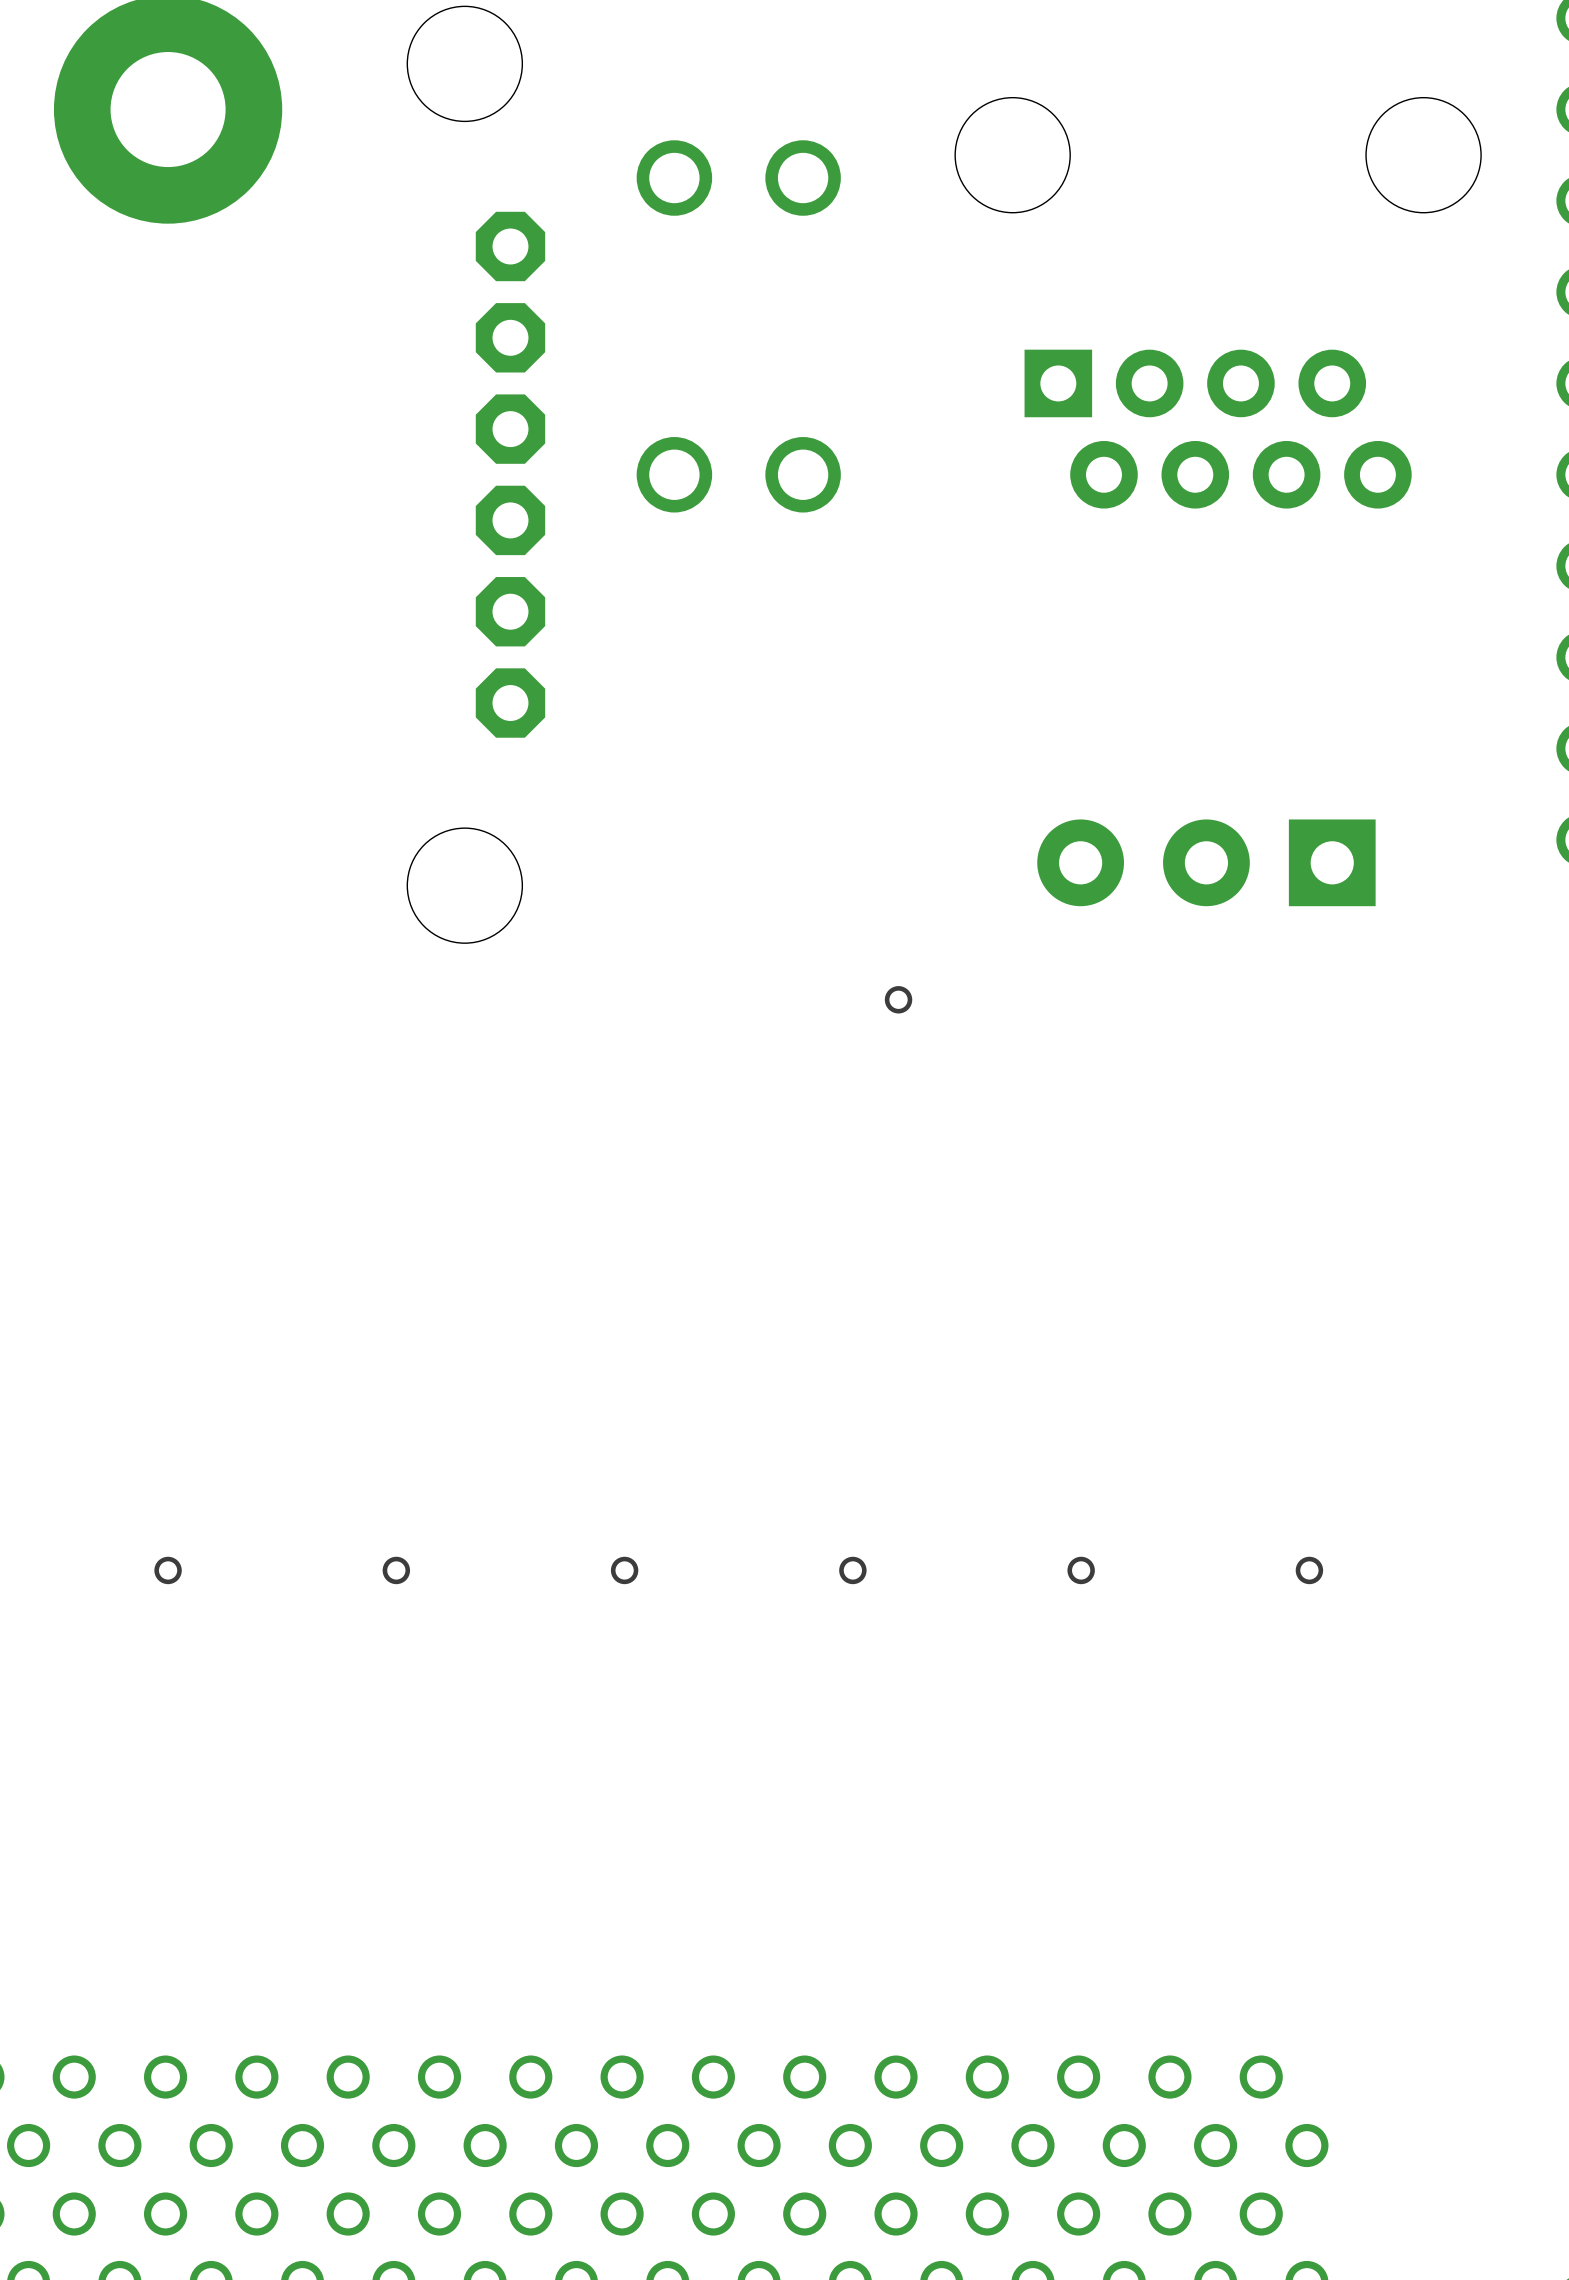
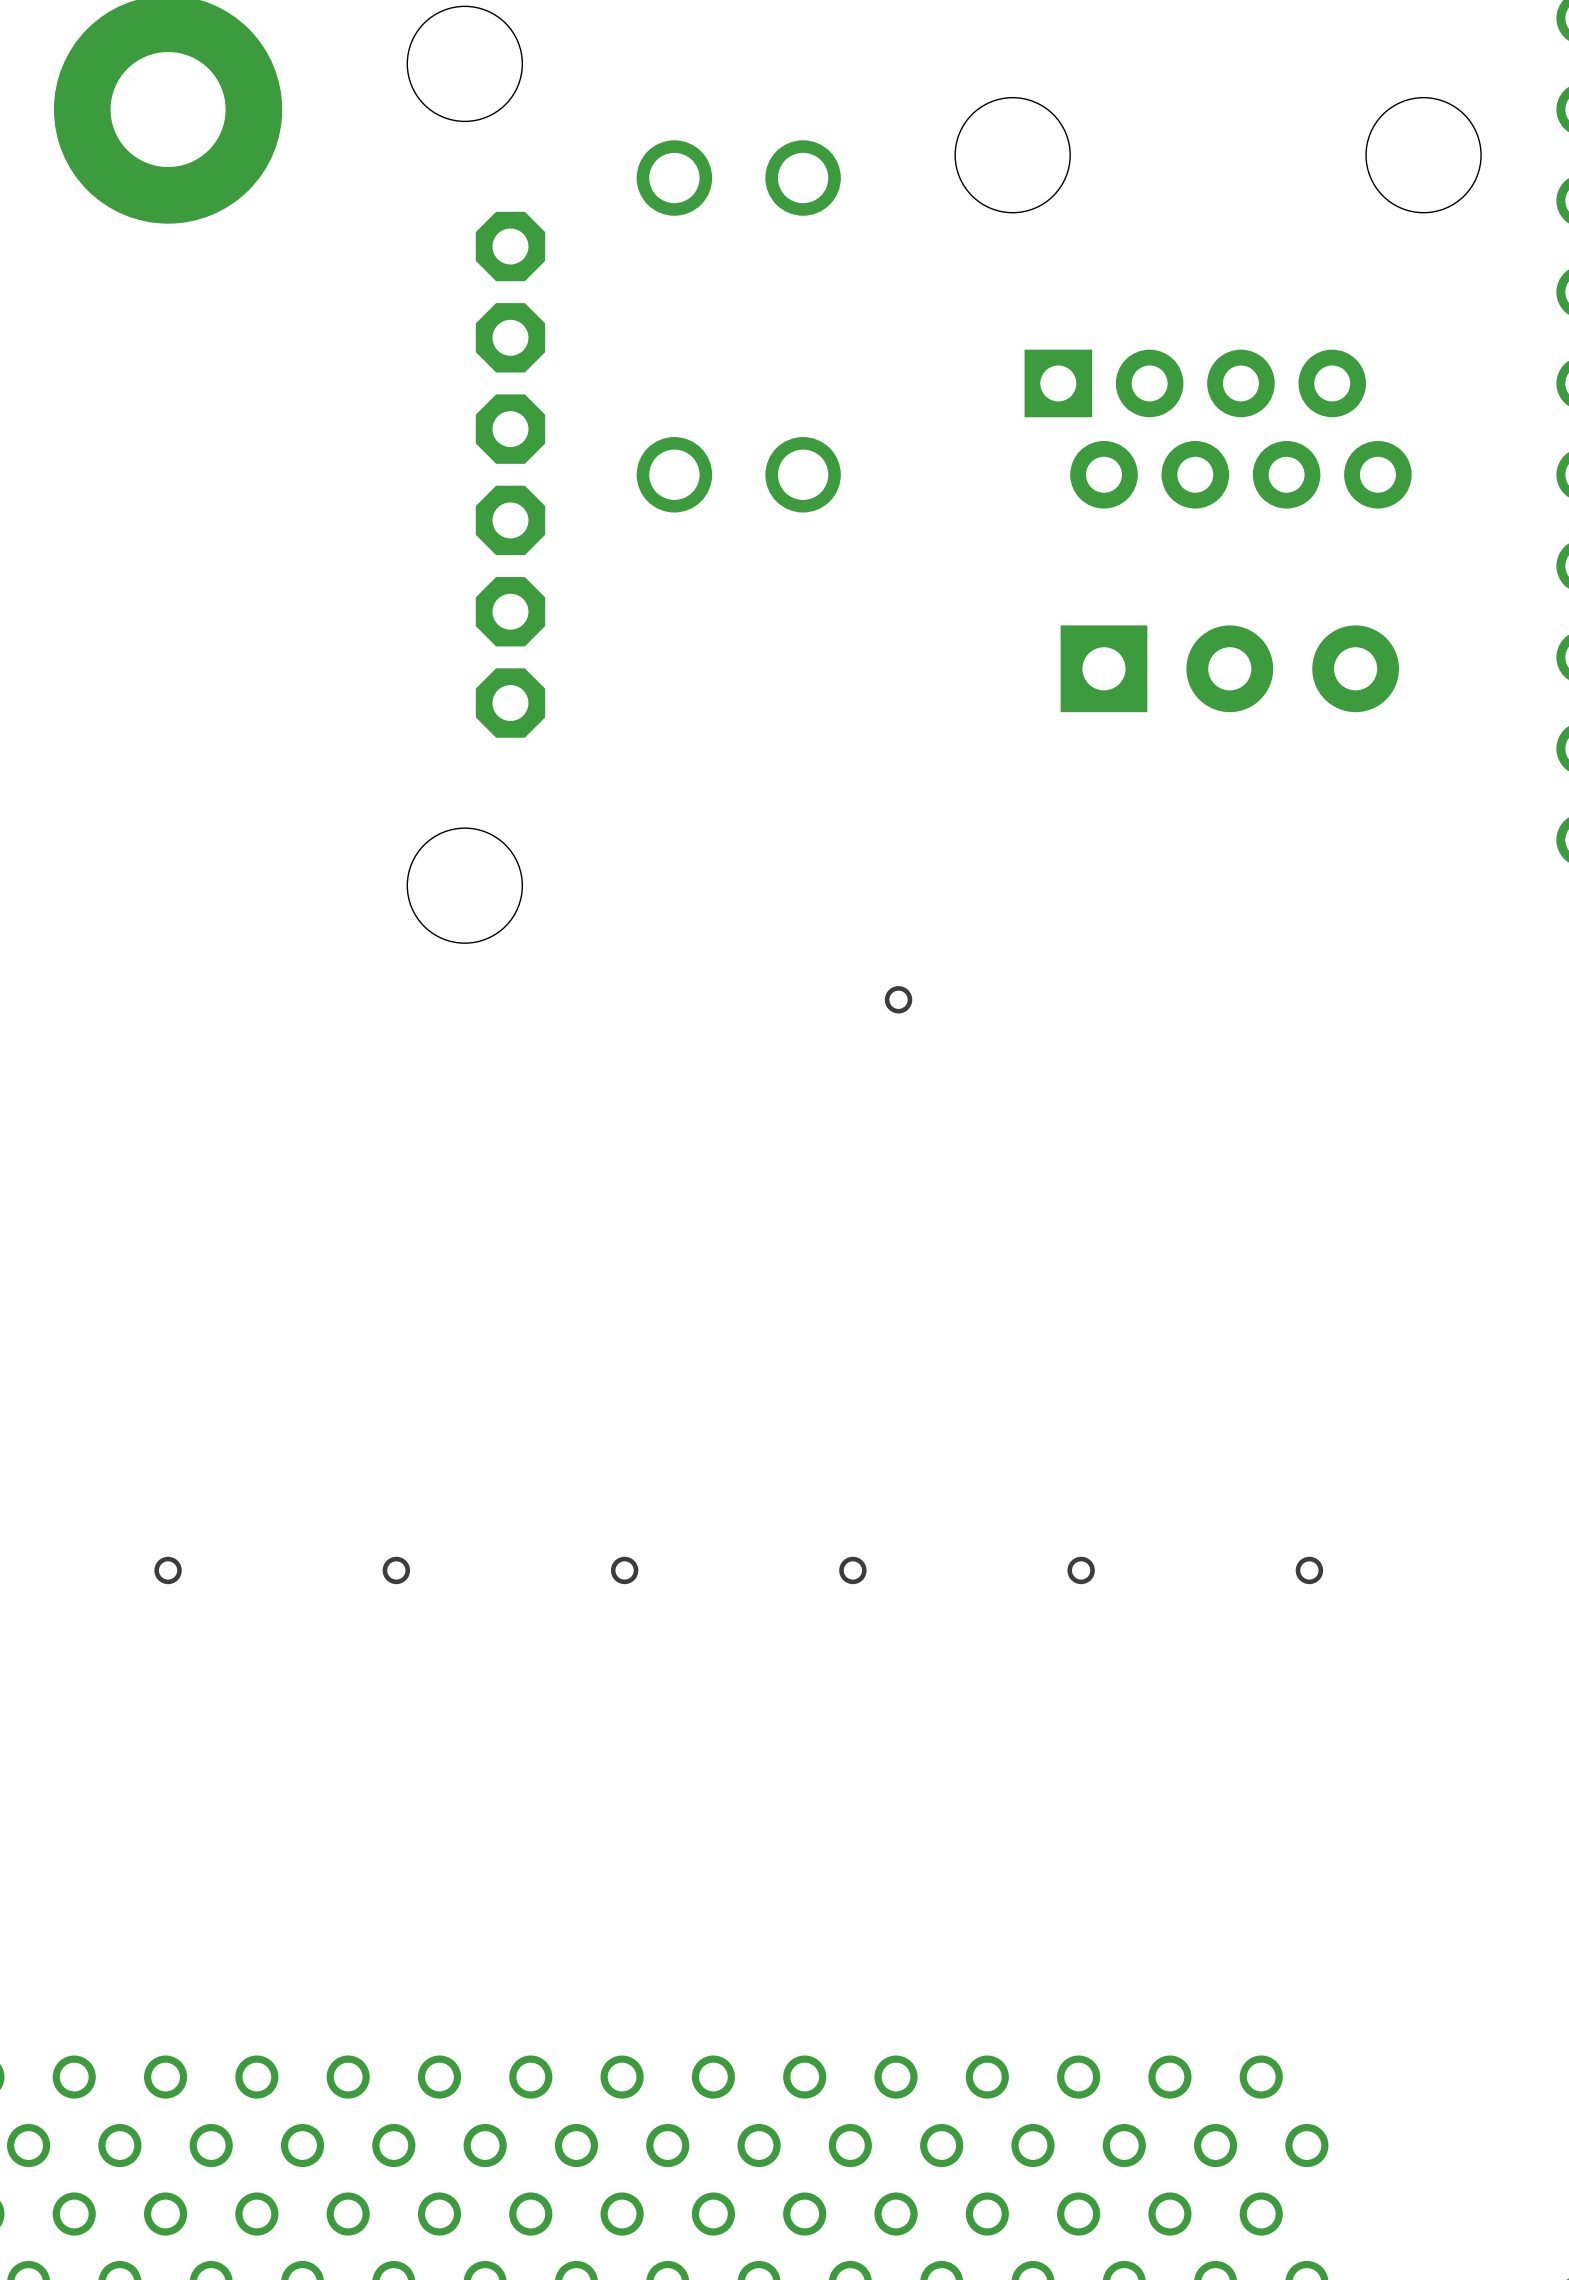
part rotation: 0° (1206, 862) -> 180° (1229, 668)

